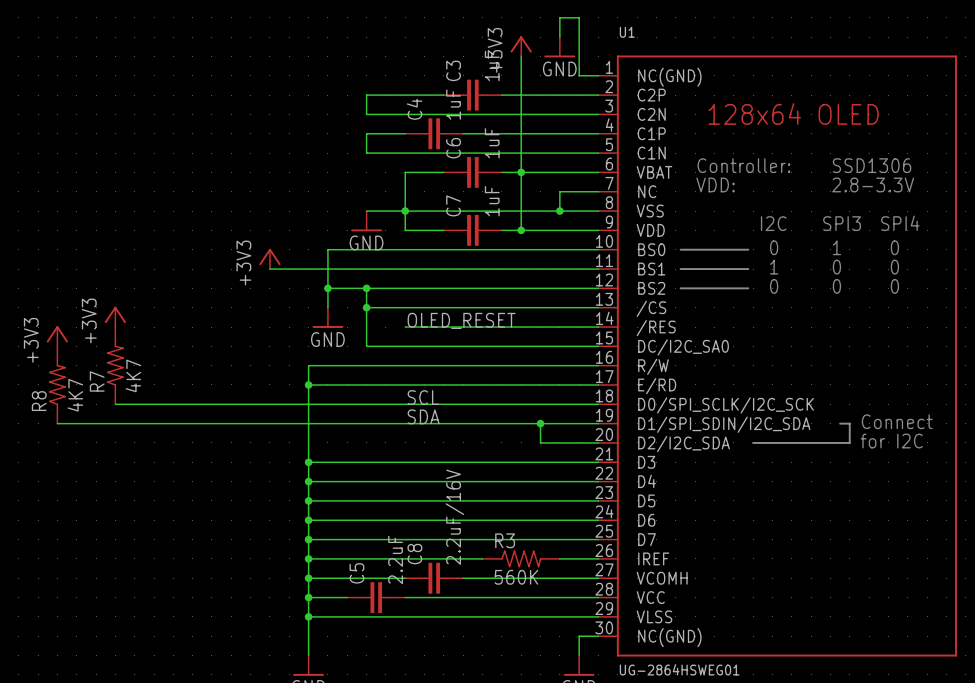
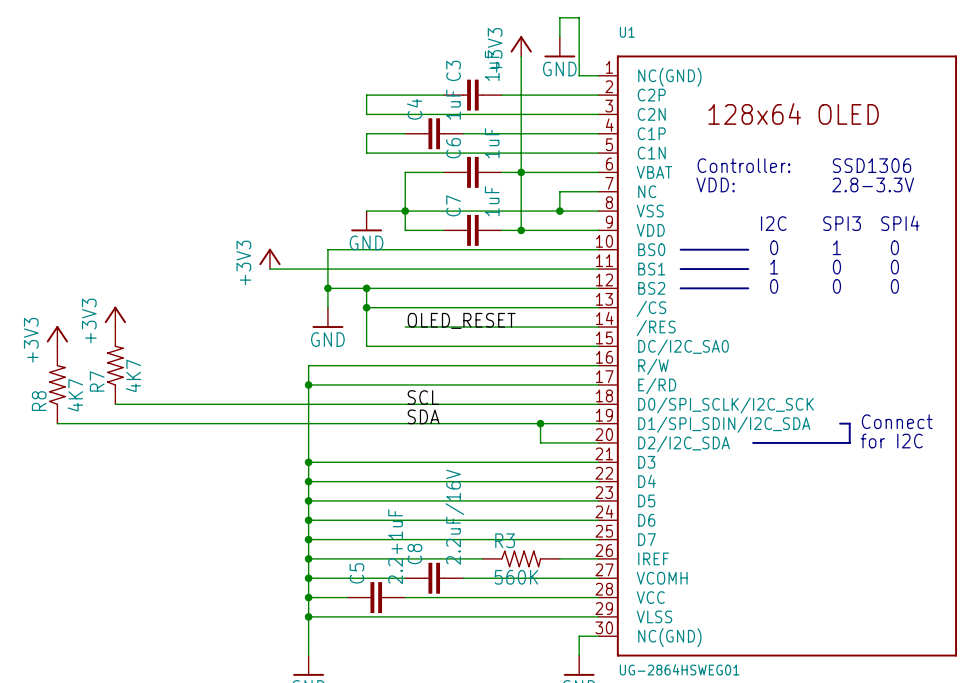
C5 value: 2.2uF (395, 560) -> 2.2+1uF (395, 546)

